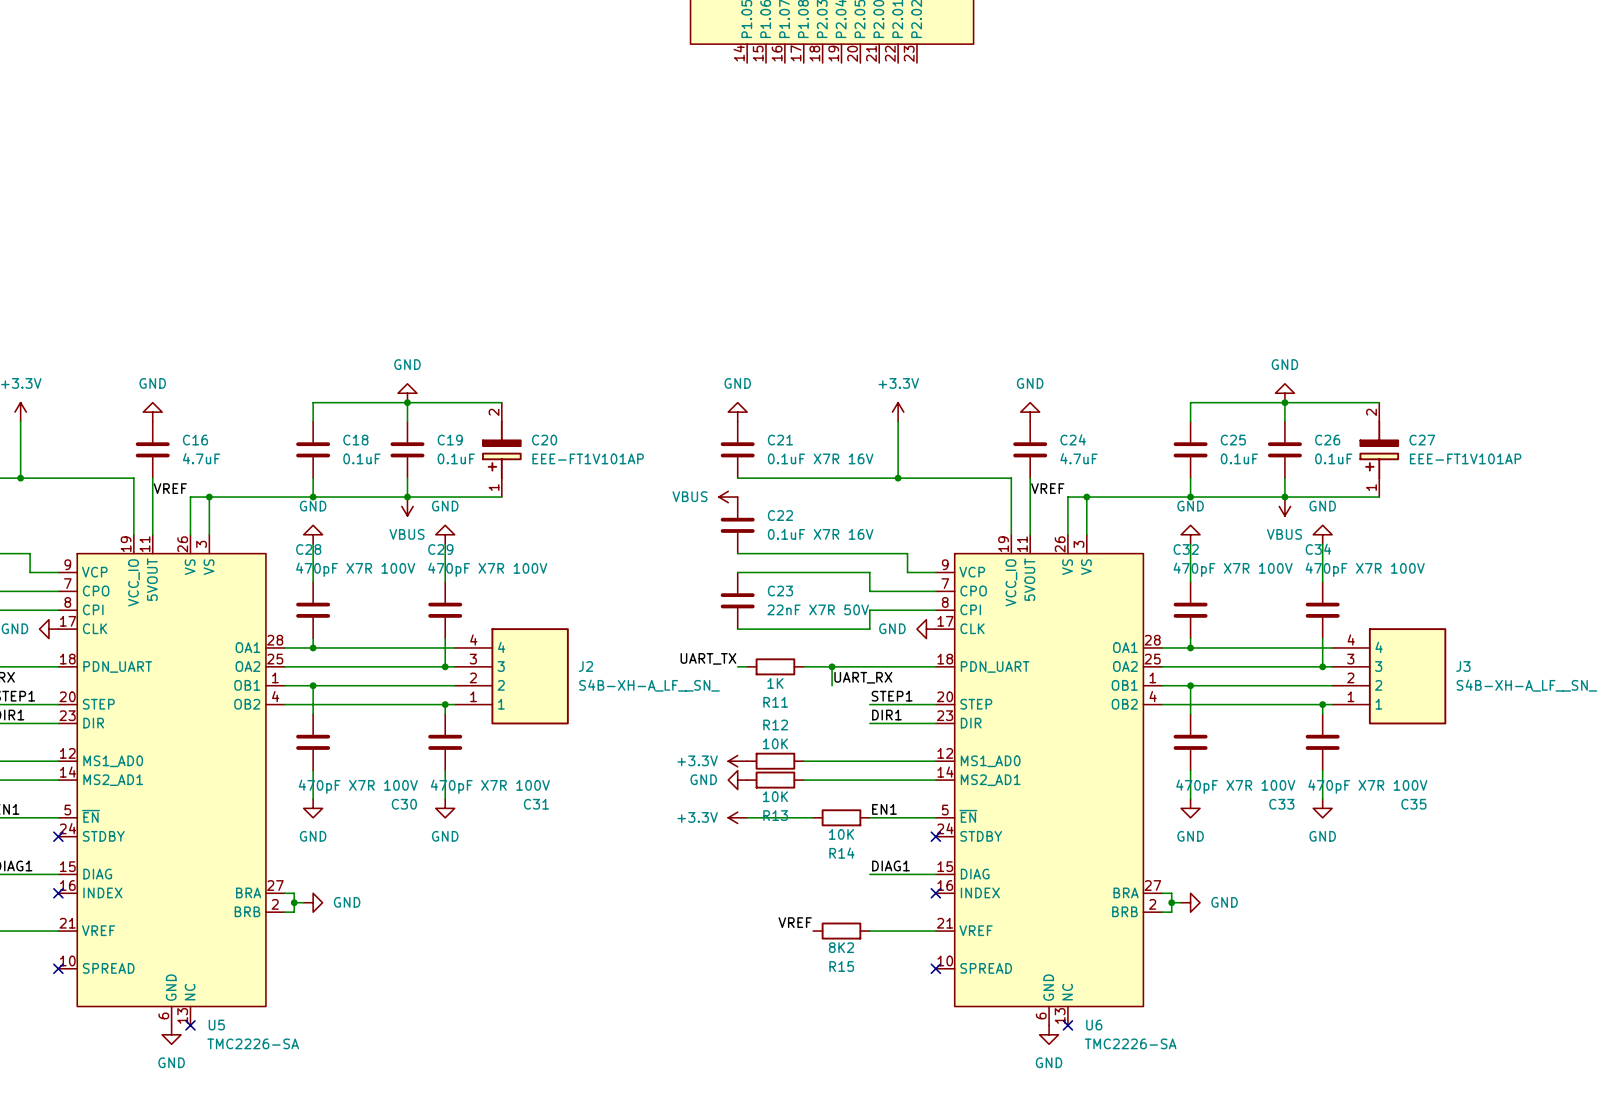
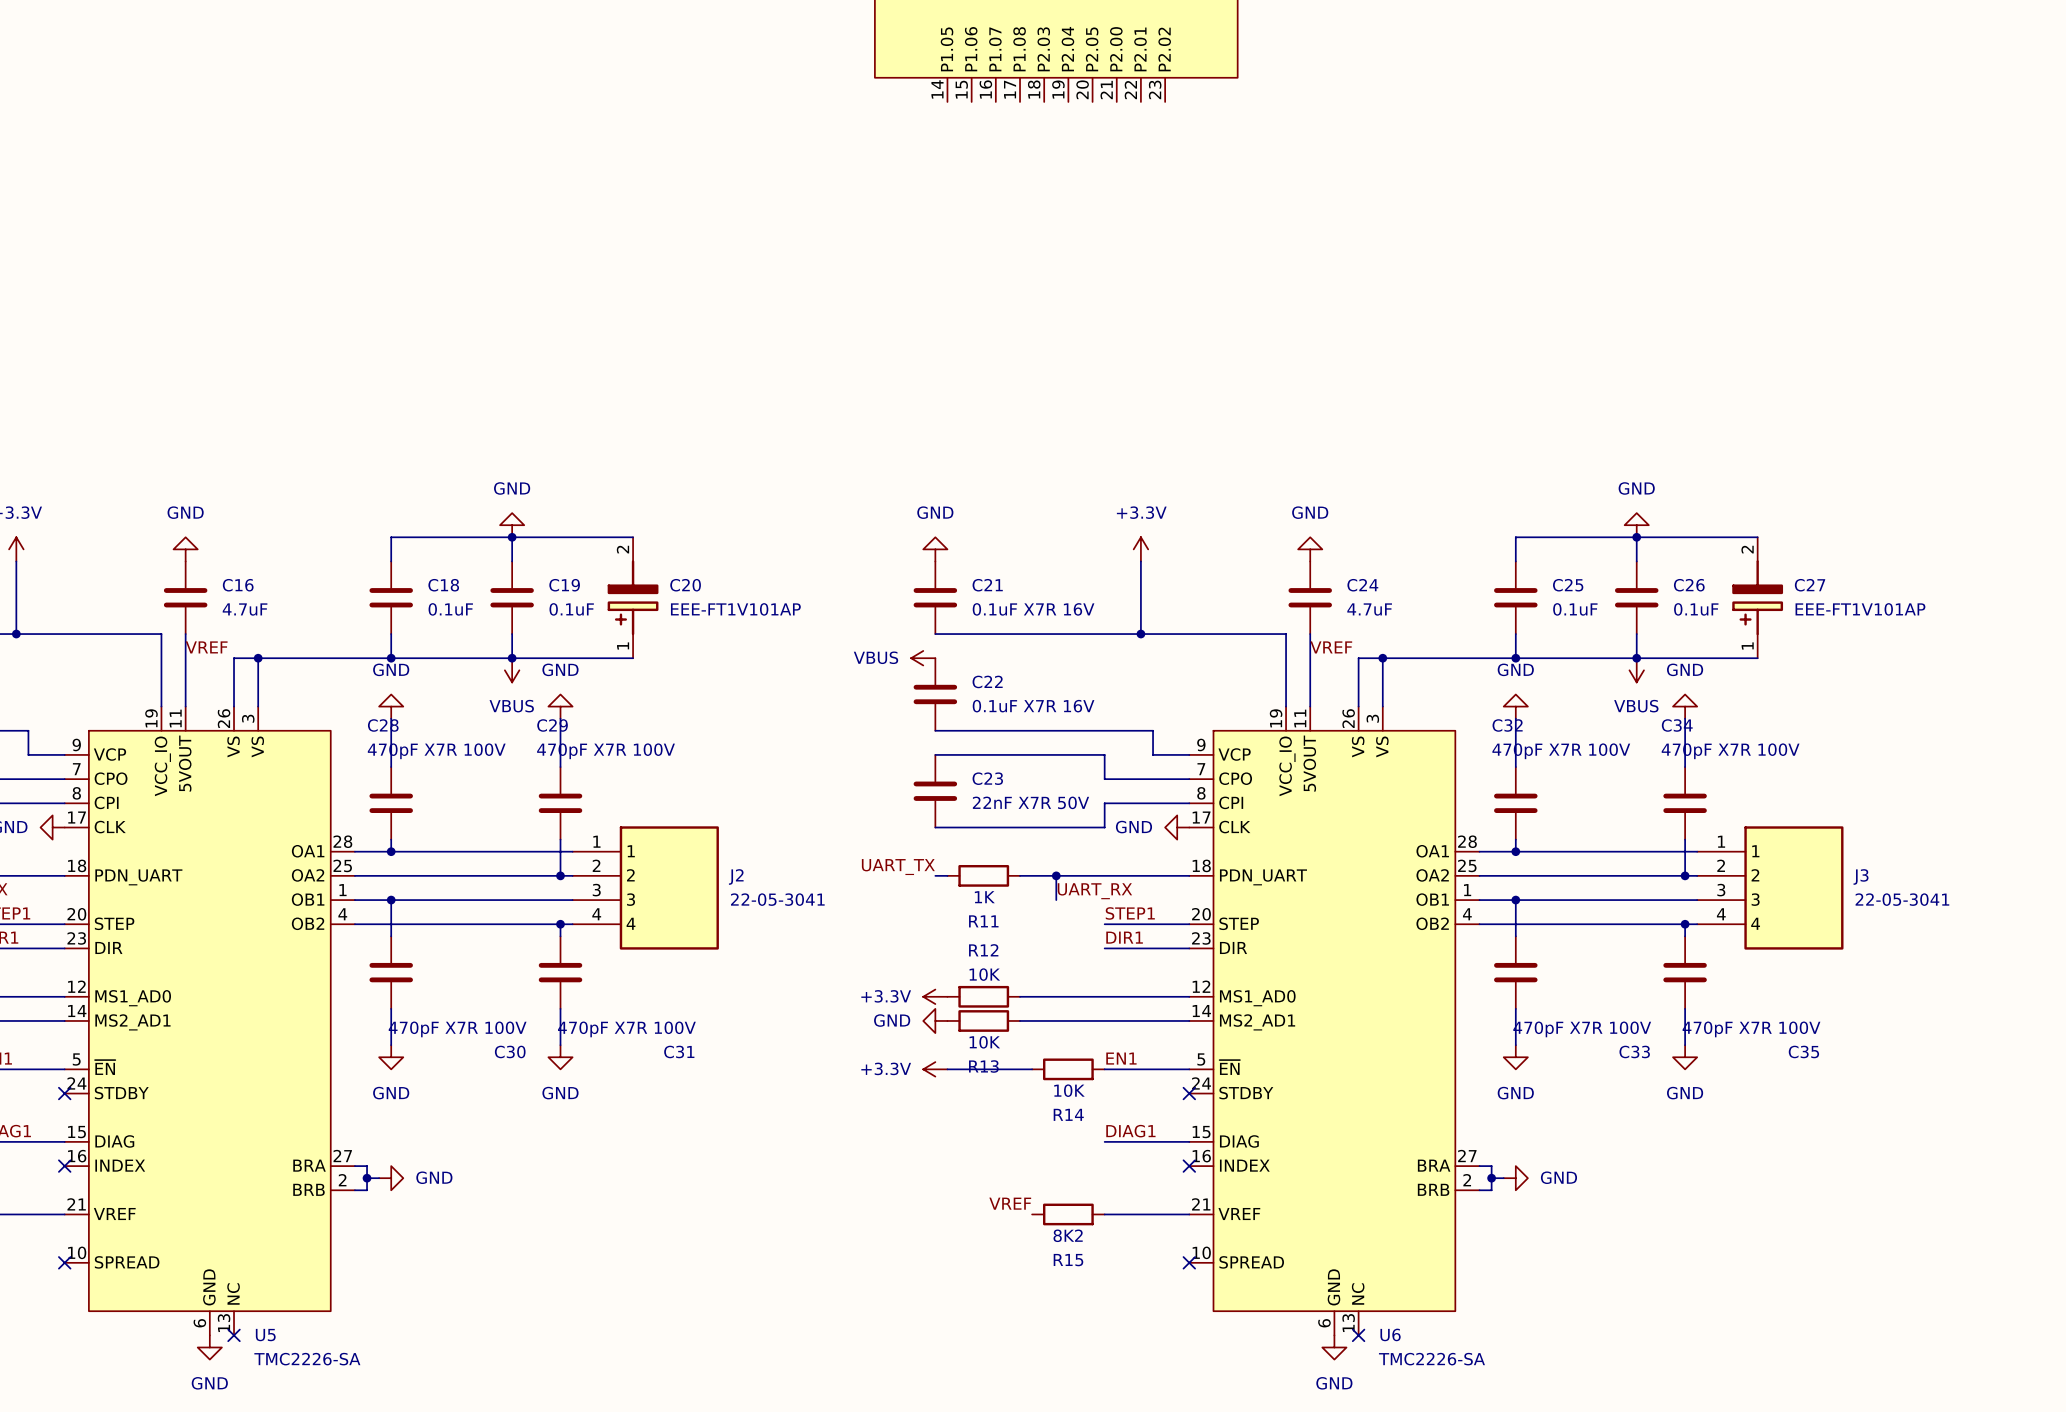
J2 flip: as is (530, 676) -> up-down (669, 887)
J3 flip: as is (1407, 676) -> up-down (1793, 887)
J2 value: S4B-XH-A_LF__SN_ (649, 685) -> 22-05-3041 (777, 899)
J3 value: S4B-XH-A_LF__SN_ (1526, 685) -> 22-05-3041 (1902, 899)

